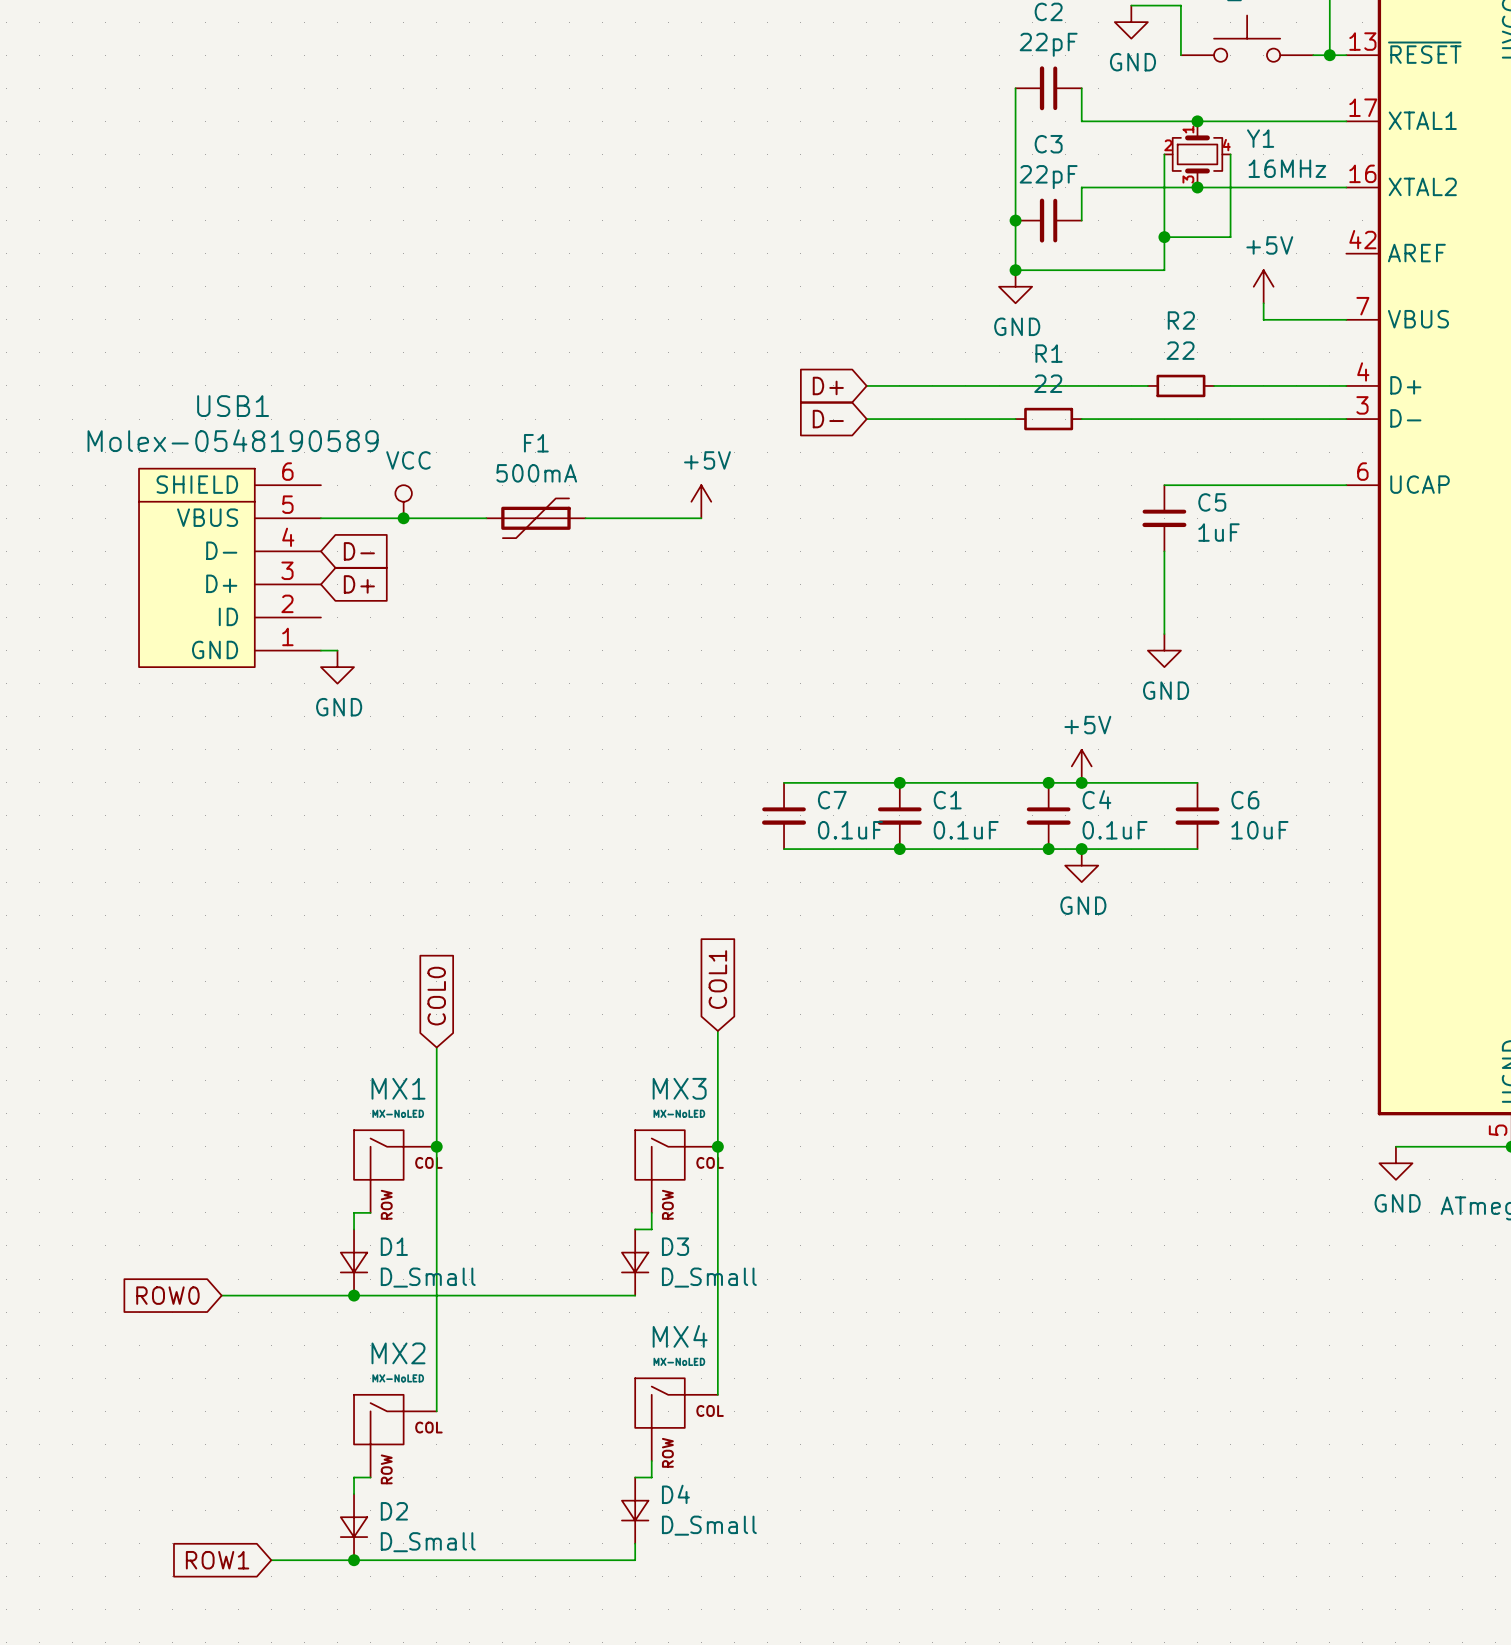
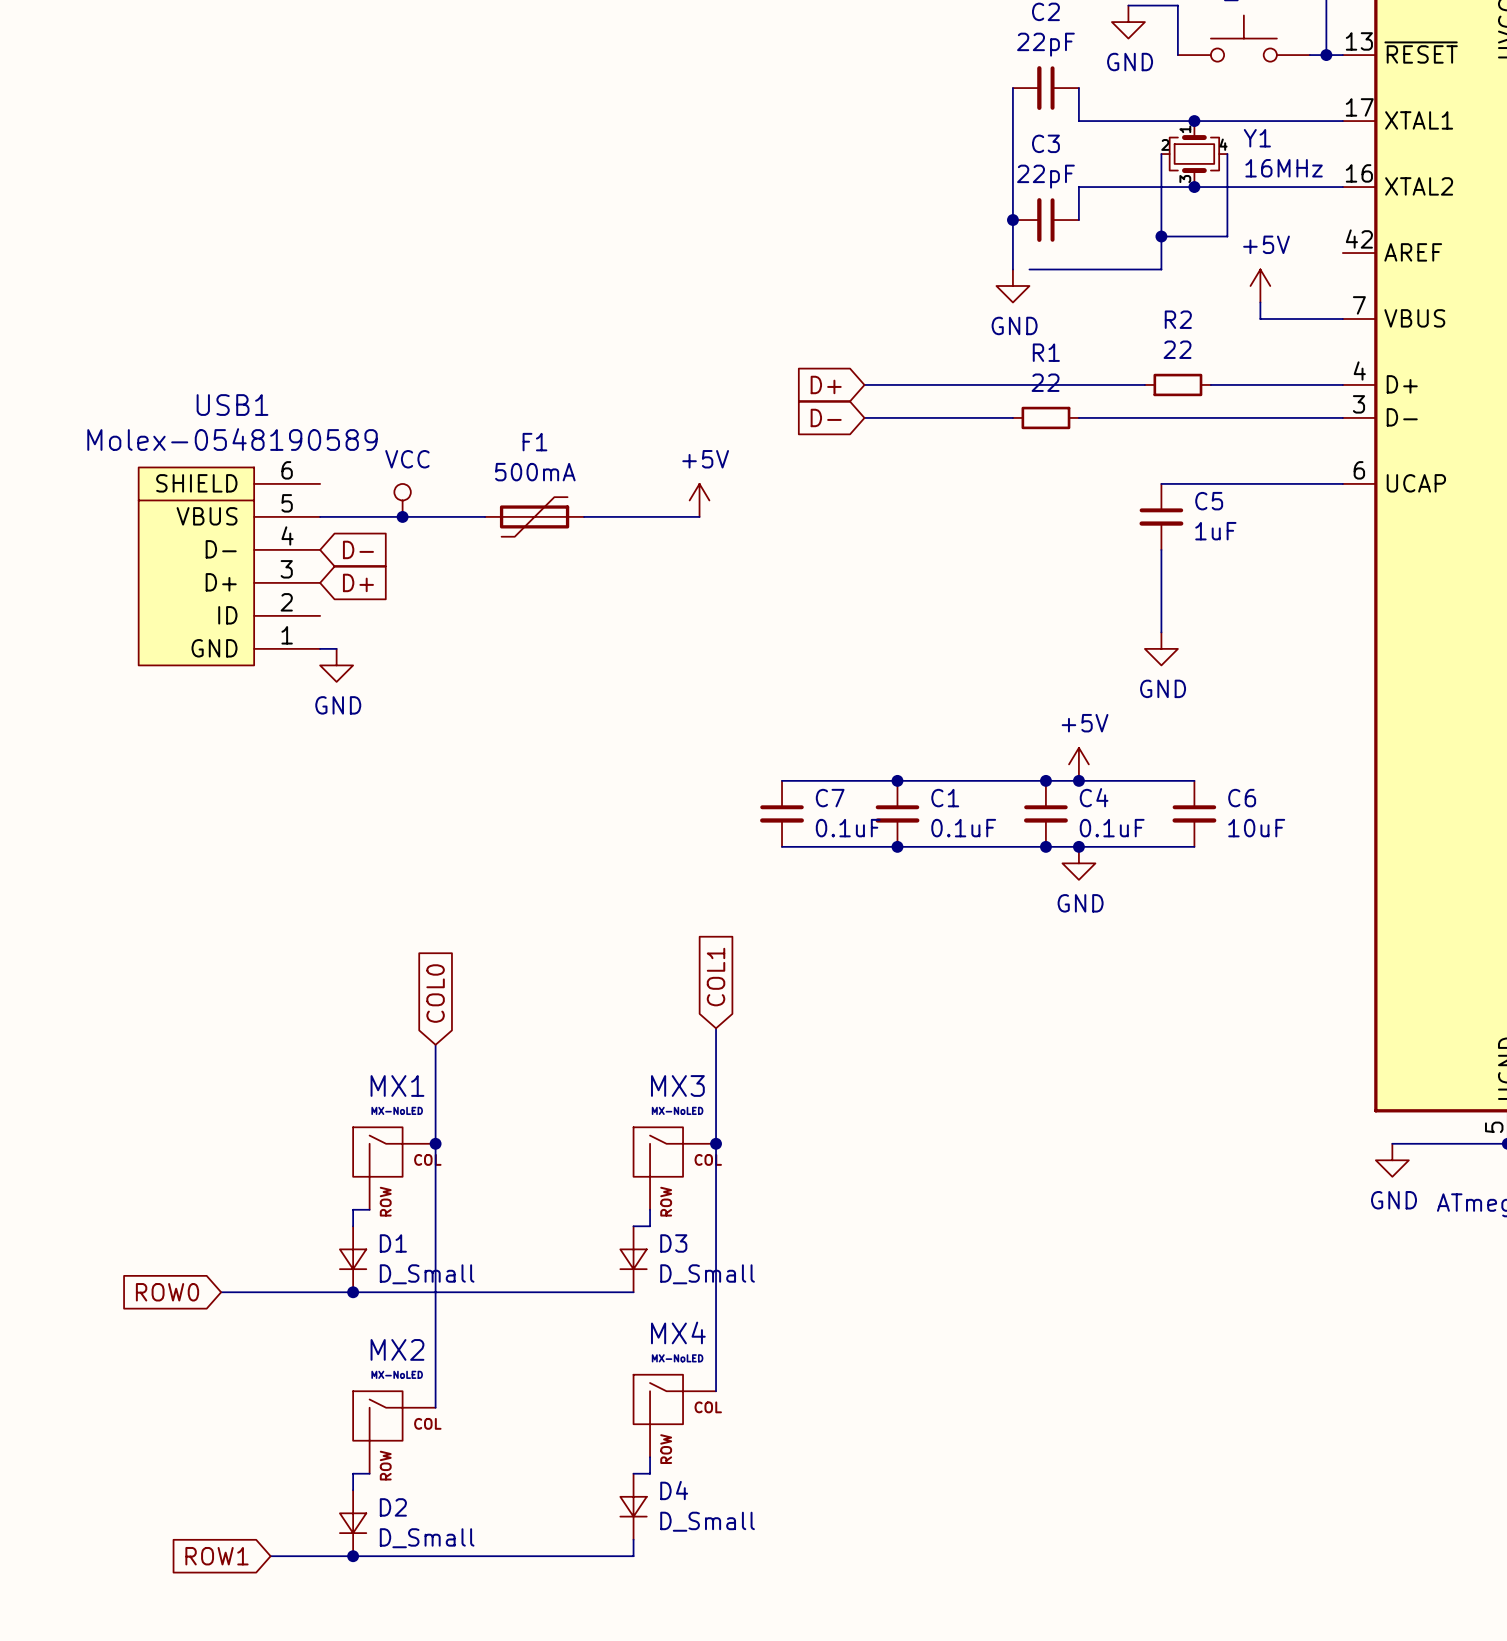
wire: (1015, 270) (1032, 270) -> none
junction: (1015, 270) -> none

